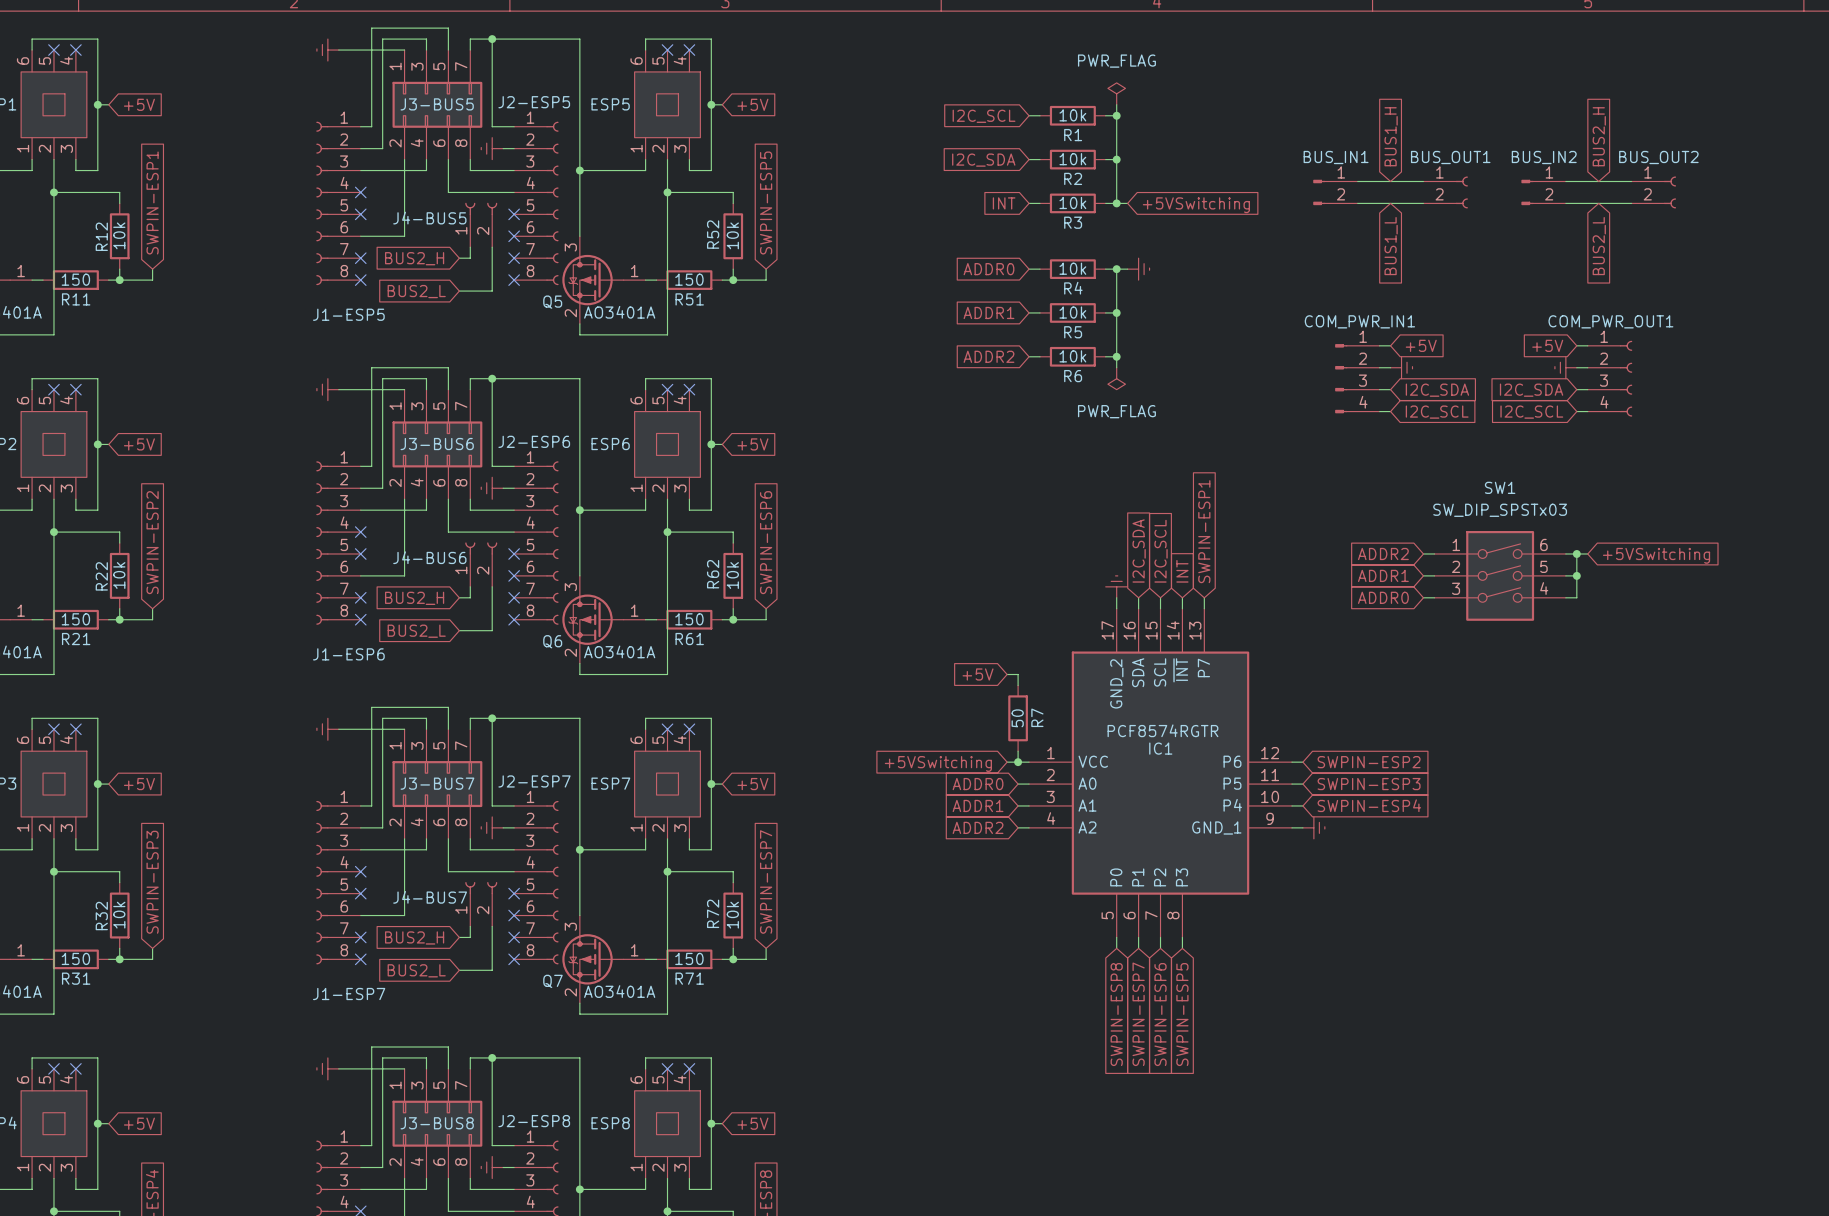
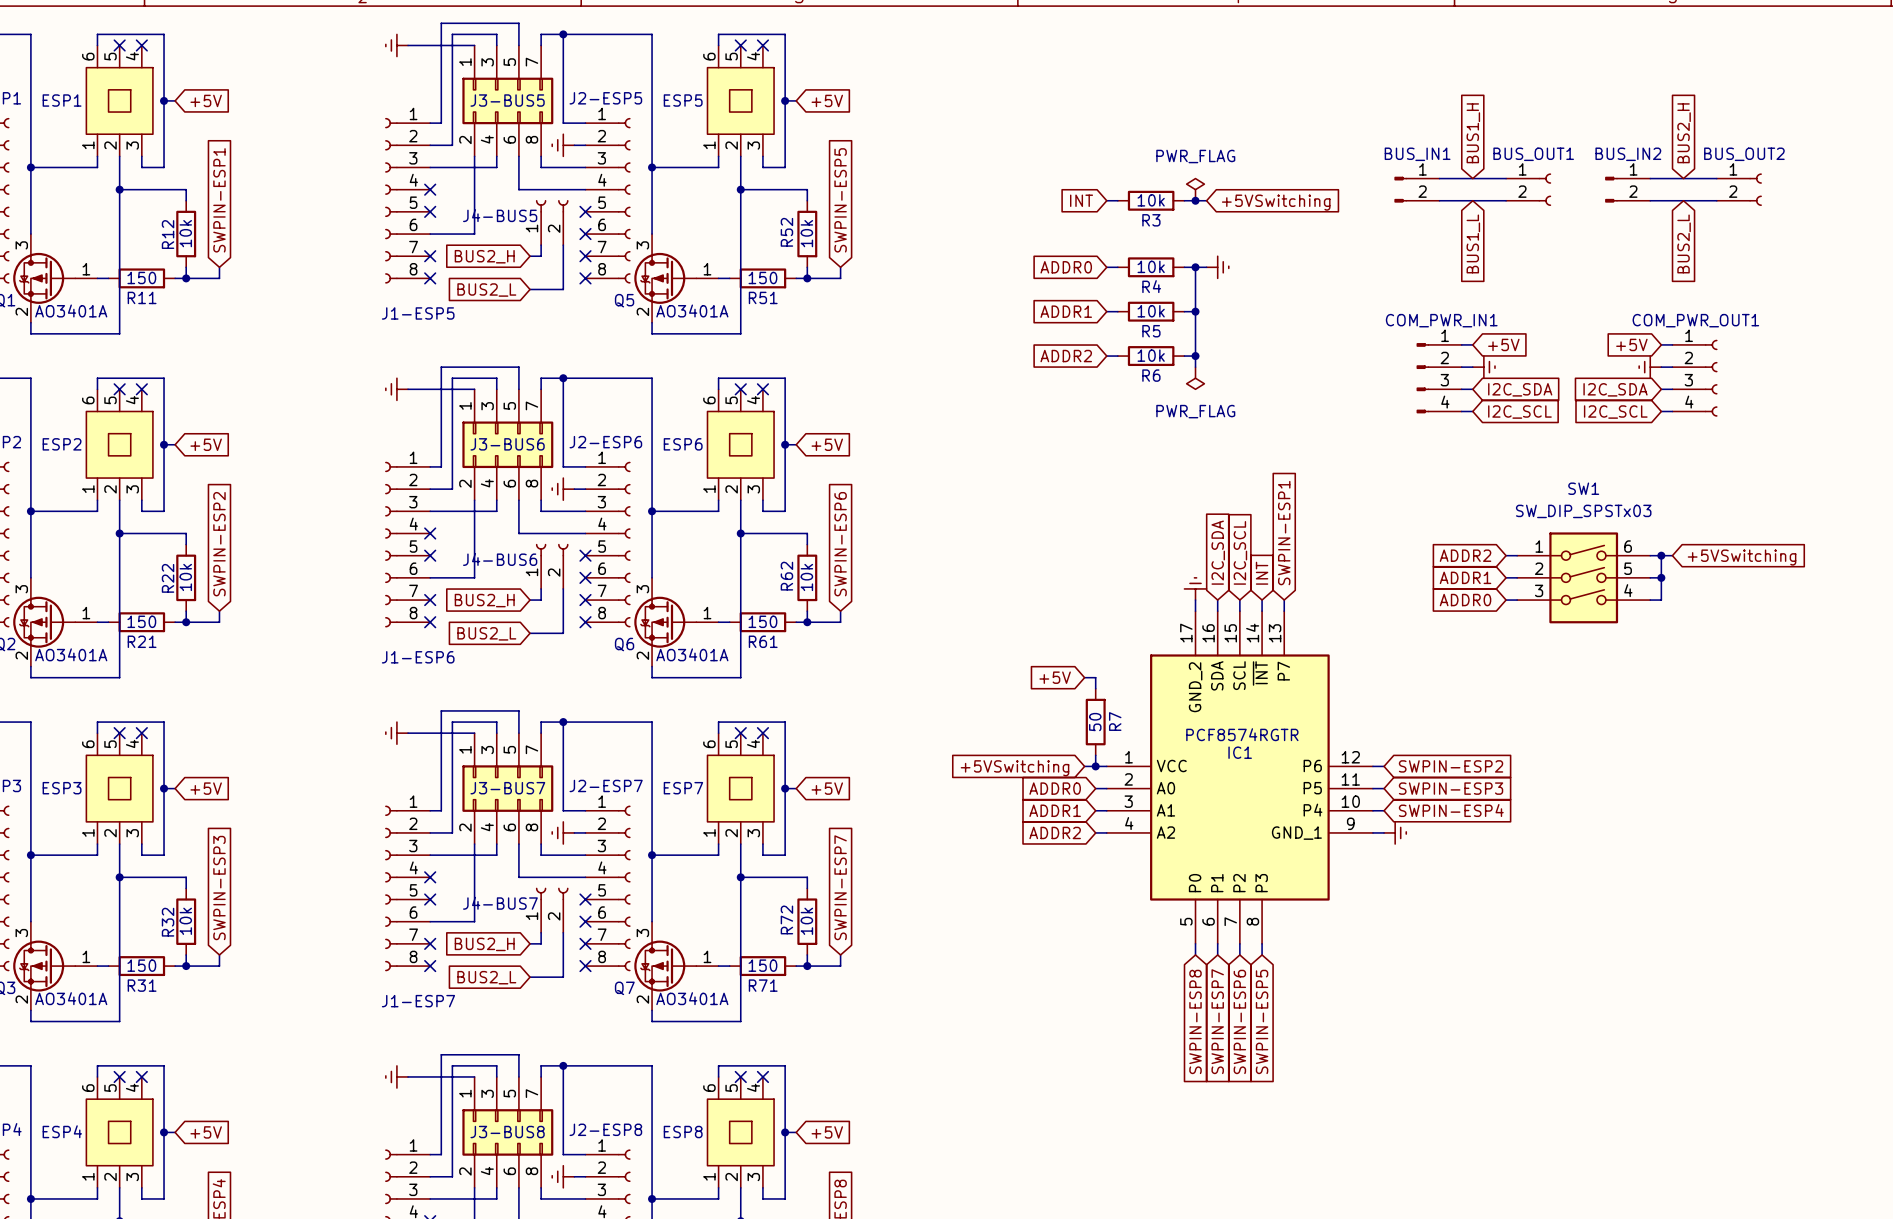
power symbol position: PWR_FLAG (1116, 93) -> PWR_FLAG (1195, 189)
wire: (1116, 104) (1116, 203) -> none
wire: (1029, 115) (1040, 115) -> none
R1: 10k (1072, 115) -> none
wire: (1105, 115) (1116, 115) -> none
junction: (1116, 115) -> none
global label: I2C_SCL (984, 116) -> none
wire: (1029, 159) (1040, 159) -> none
R2: 10k (1072, 159) -> none
wire: (1105, 159) (1116, 159) -> none
junction: (1116, 159) -> none
global label: I2C_SDA (983, 160) -> none

